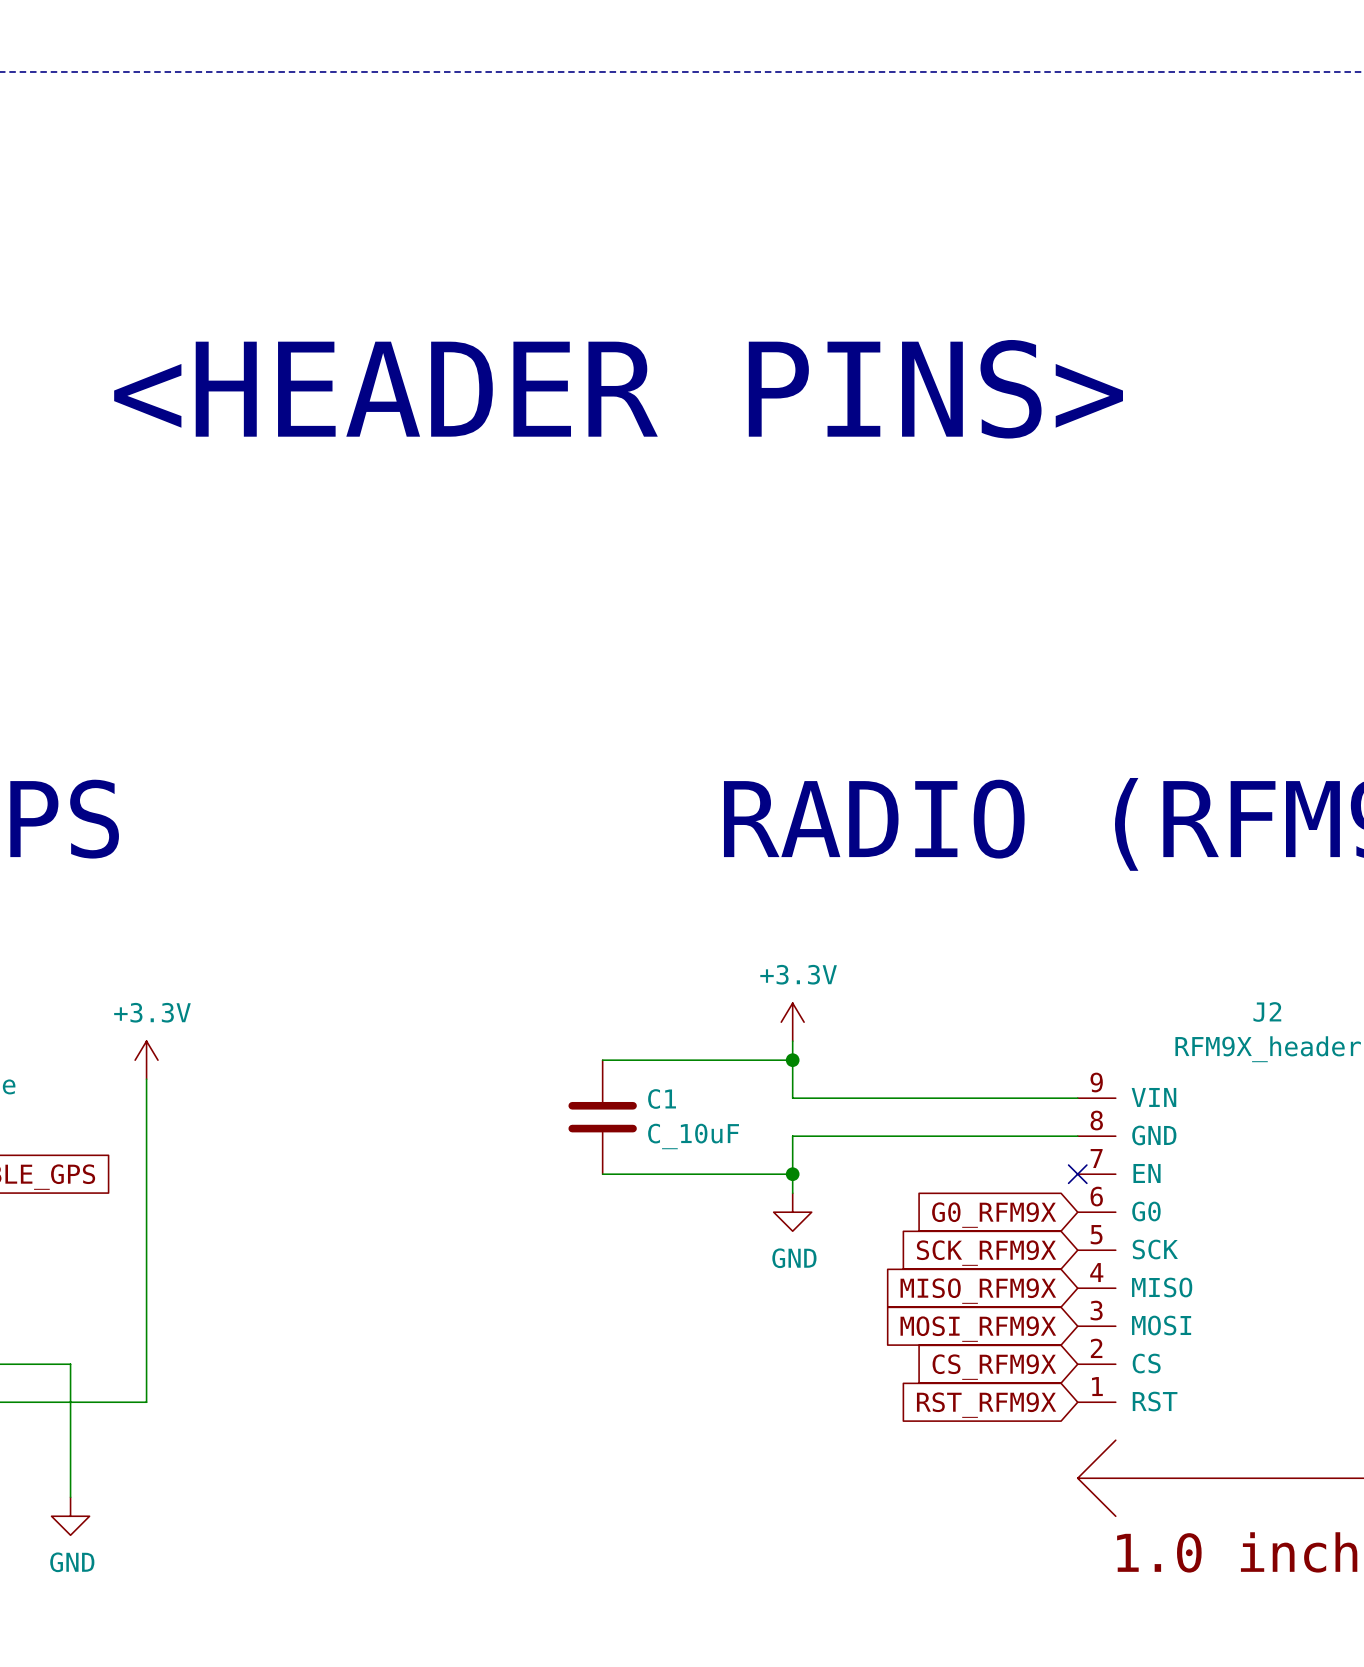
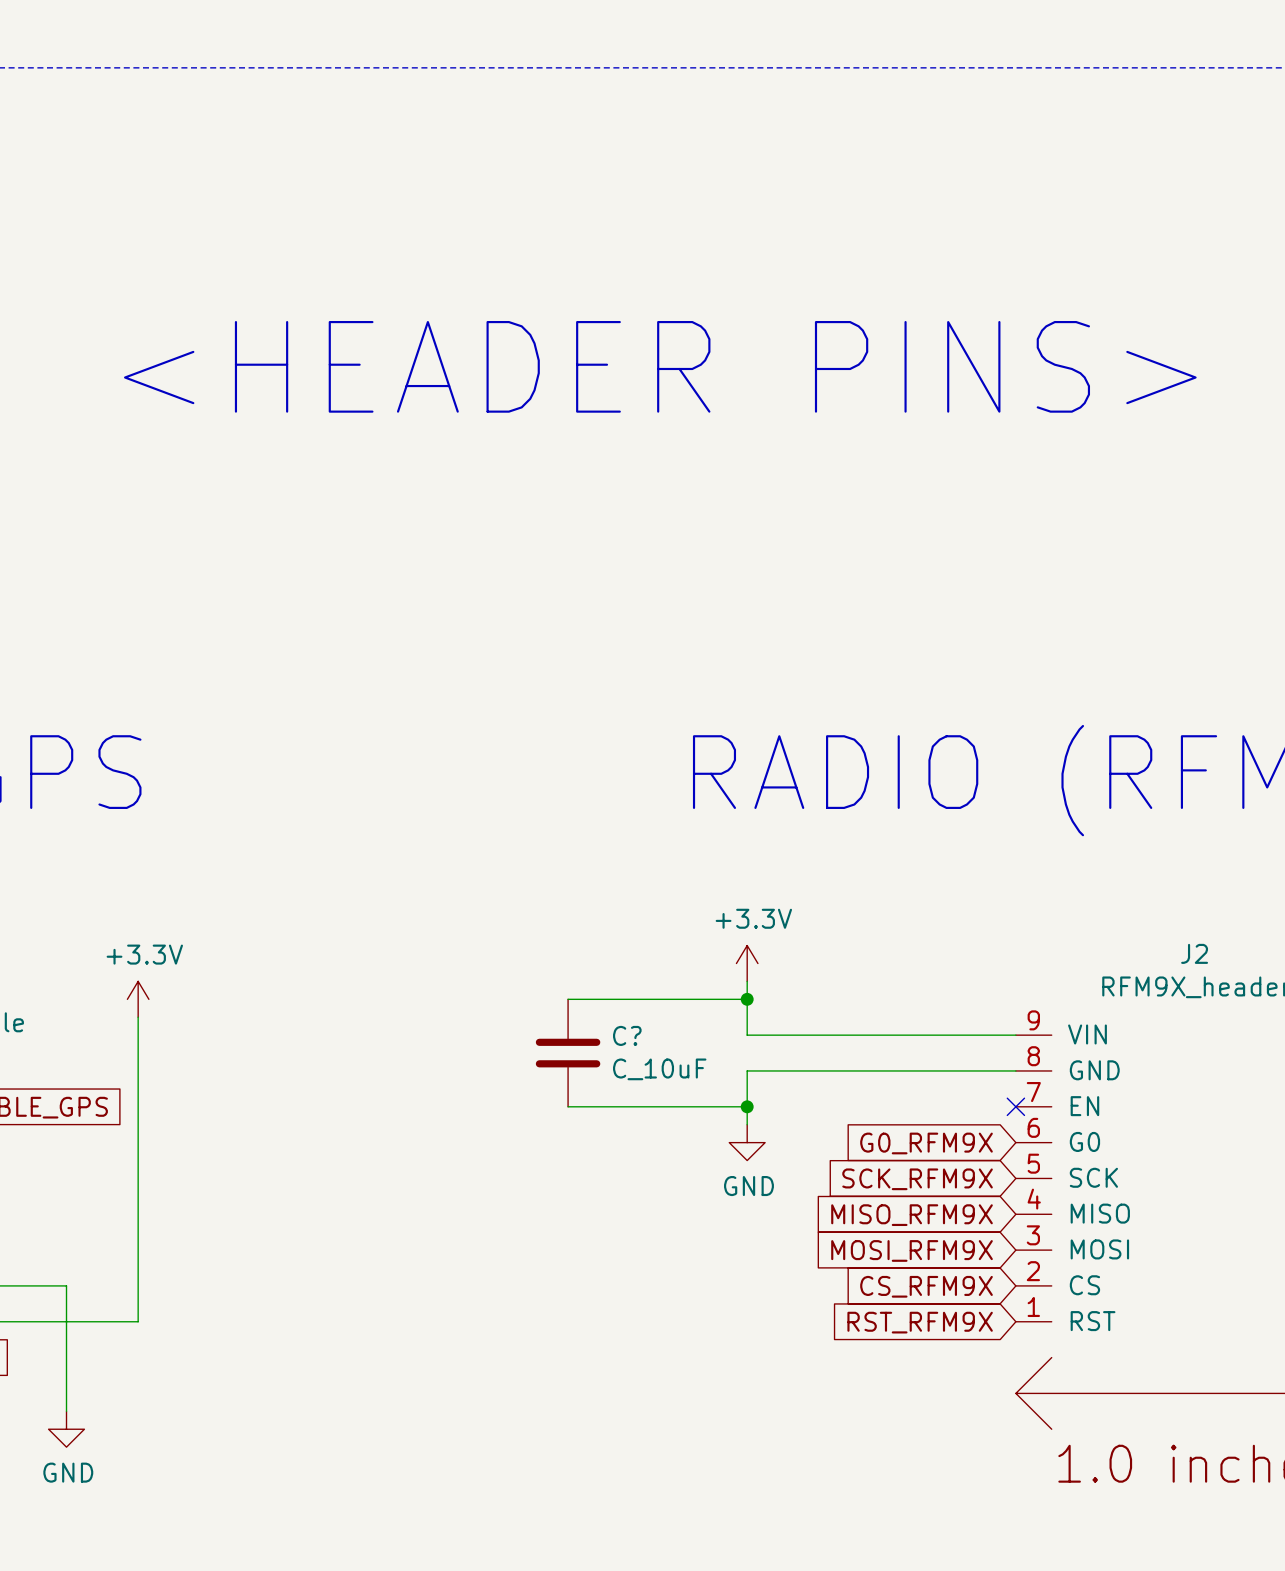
C1 name: C1 (662, 1099) -> C? (627, 1035)

